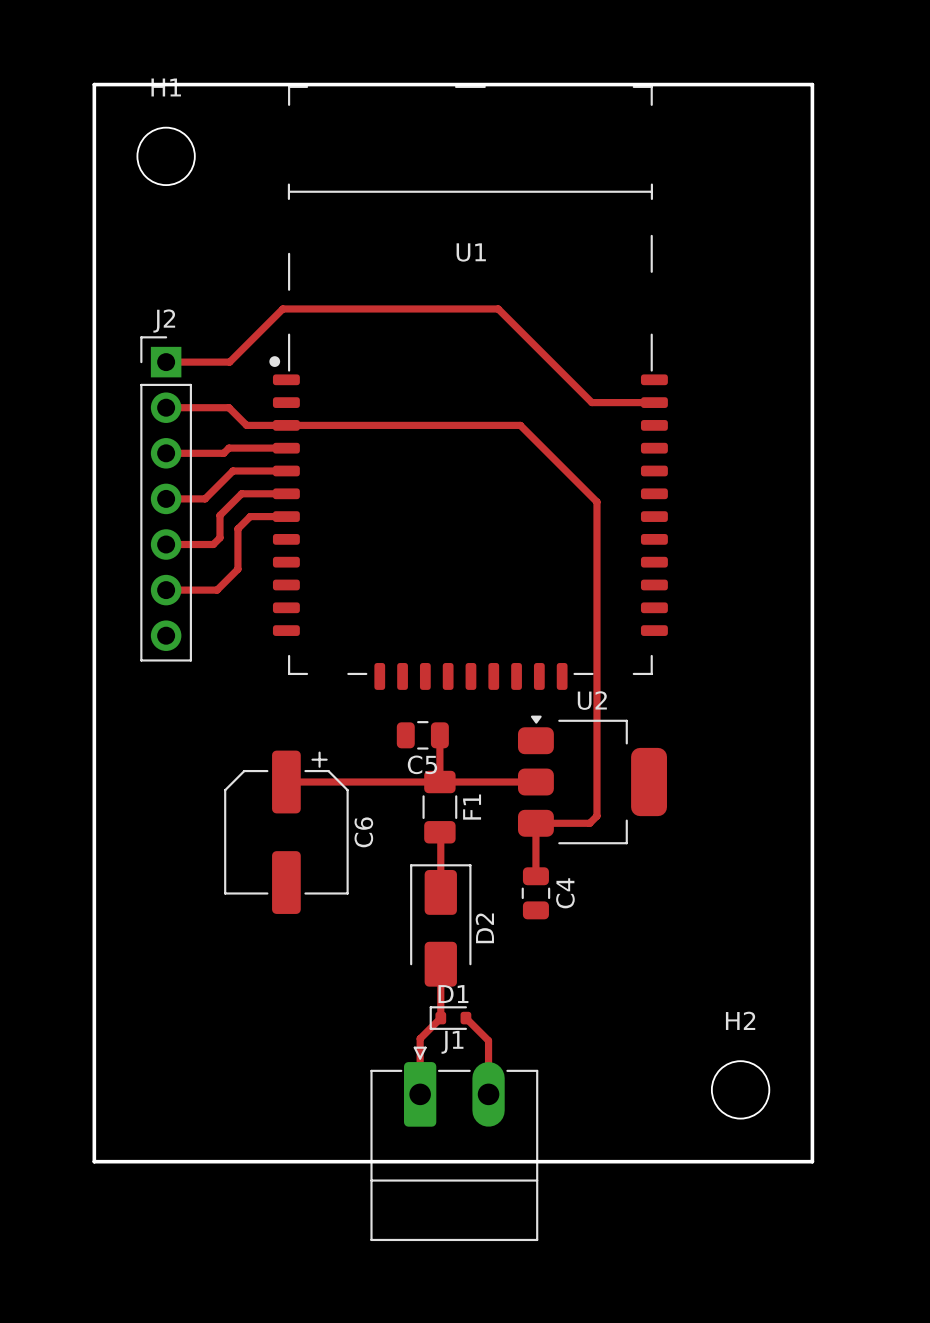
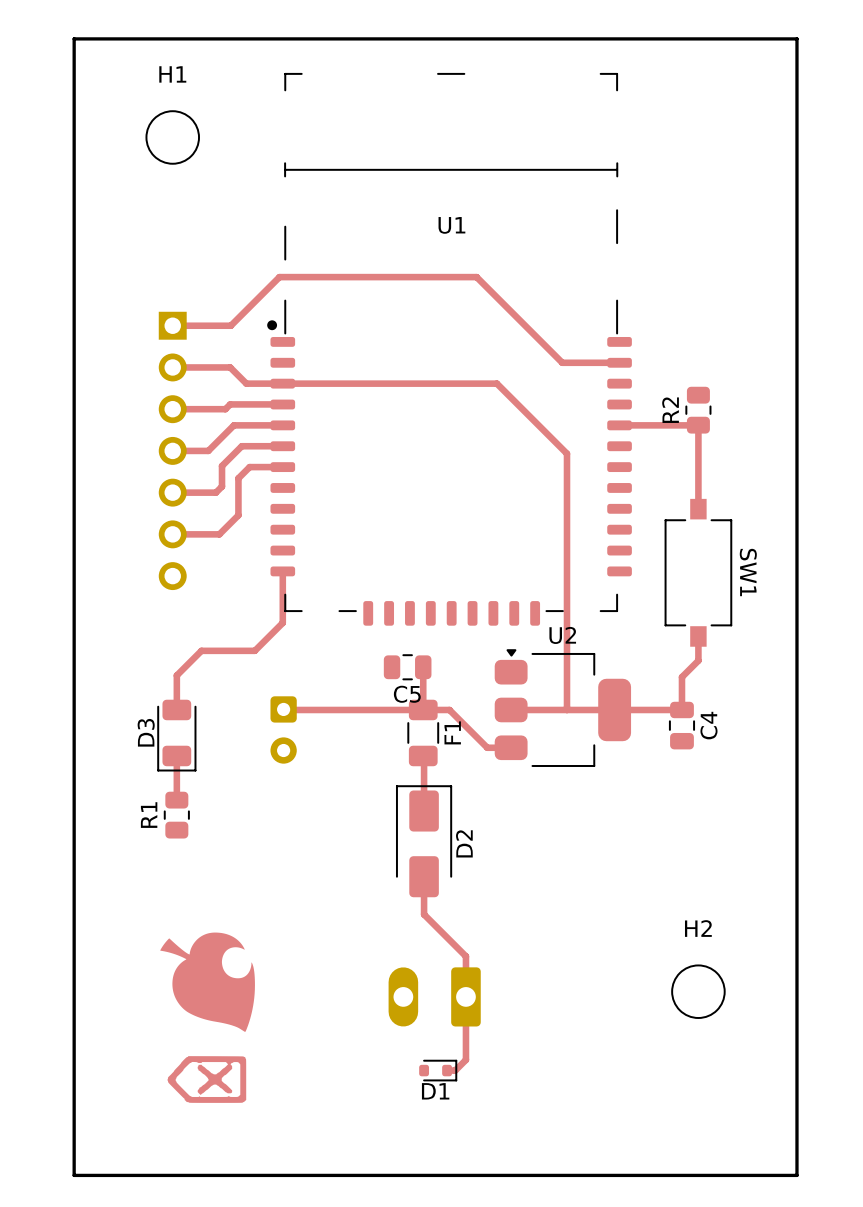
board edge: (94, 84) (812, 84) (812, 1161) (94, 1161) (94, 84) -> (74, 38) (74, 1175) (796, 1175) (796, 38) (74, 38)
R2: none -> (698, 410)
top track: none -> (619, 425) (698, 425)
top track: none -> (698, 425) (698, 509)
J2 side: top (166, 498) -> bottom (172, 450)
top track: none -> (282, 571) (282, 622) (254, 650) (201, 650) (176, 675) (176, 709)
SW1: none -> (698, 572)
top track: none -> (698, 636) (698, 660) (681, 677) (681, 709) (511, 709)
top track: (468, 782) (535, 782) -> (449, 709) (487, 747) (511, 747)
top track: (596, 782) (596, 816) (589, 823) (535, 823) (535, 876) -> none
part: none -> (283, 729)
D3: none -> (176, 735)
top track: none -> (176, 755) (176, 800)
C6: (286, 832) -> none
C4 position: (535, 893) -> (681, 725)
R1: none -> (176, 815)
top track: (440, 1005) (440, 1018) (420, 1038) (420, 1094) -> (424, 914) (465, 956) (465, 1059) (455, 1070) (447, 1070)
D1 rotation: 0° (450, 1018) -> 180° (438, 1070)
D1 position: (450, 1018) -> (438, 1070)
top track: (465, 1018) (488, 1040) (488, 1094) -> none
drawing: none -> [160, 932, 255, 1032]
J1 side: top (454, 1143) -> bottom (434, 996)
drawing: none -> [167, 1056, 247, 1103]

